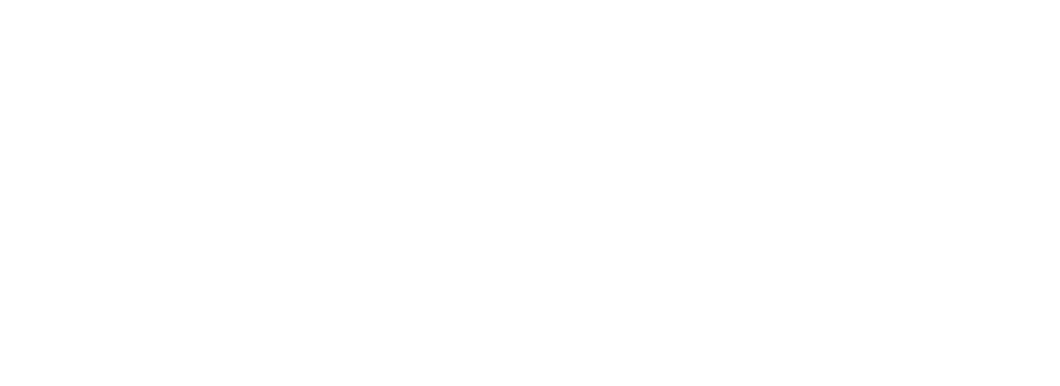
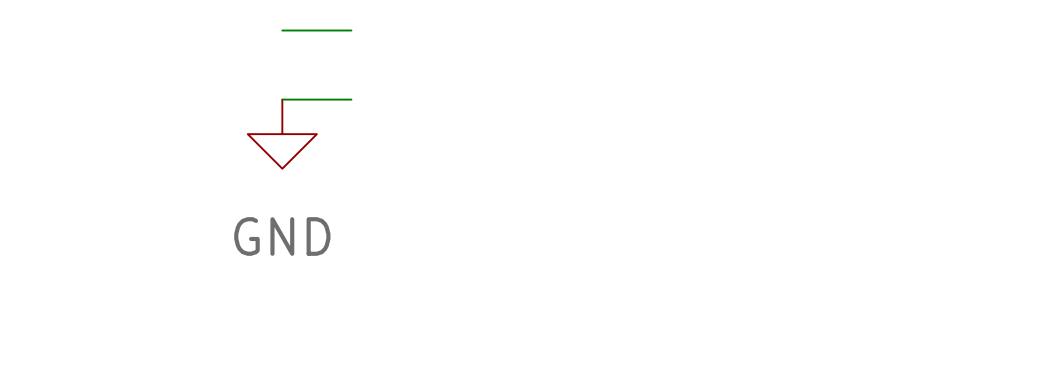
wire: none -> (282, 30) (351, 30)
wire: none -> (282, 99) (351, 99)
power symbol: none -> GND (282, 134)

